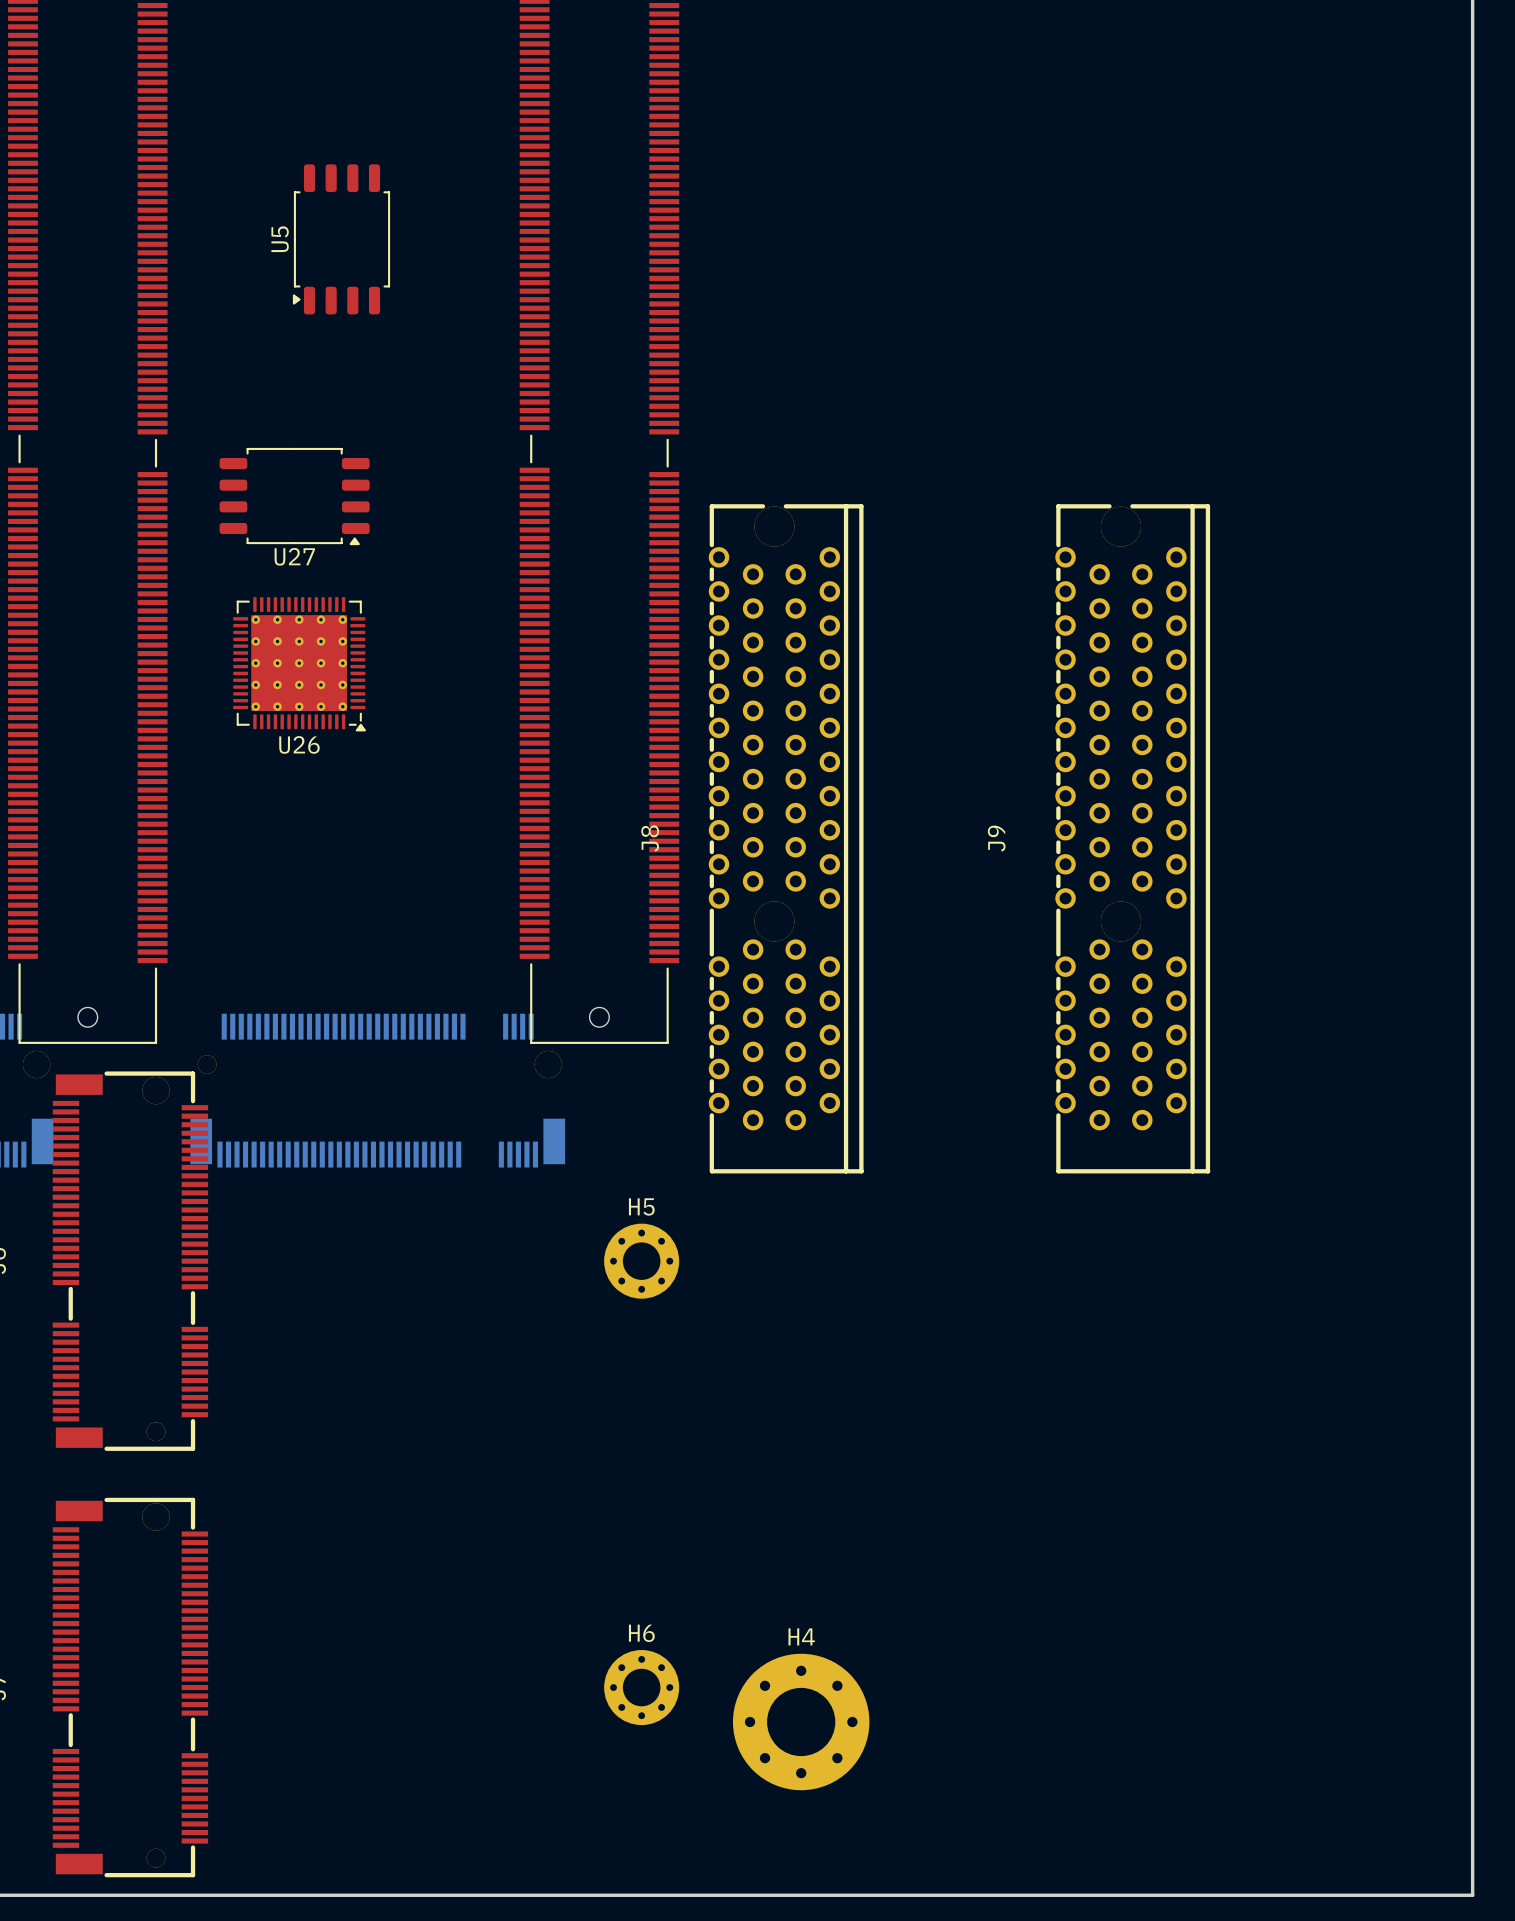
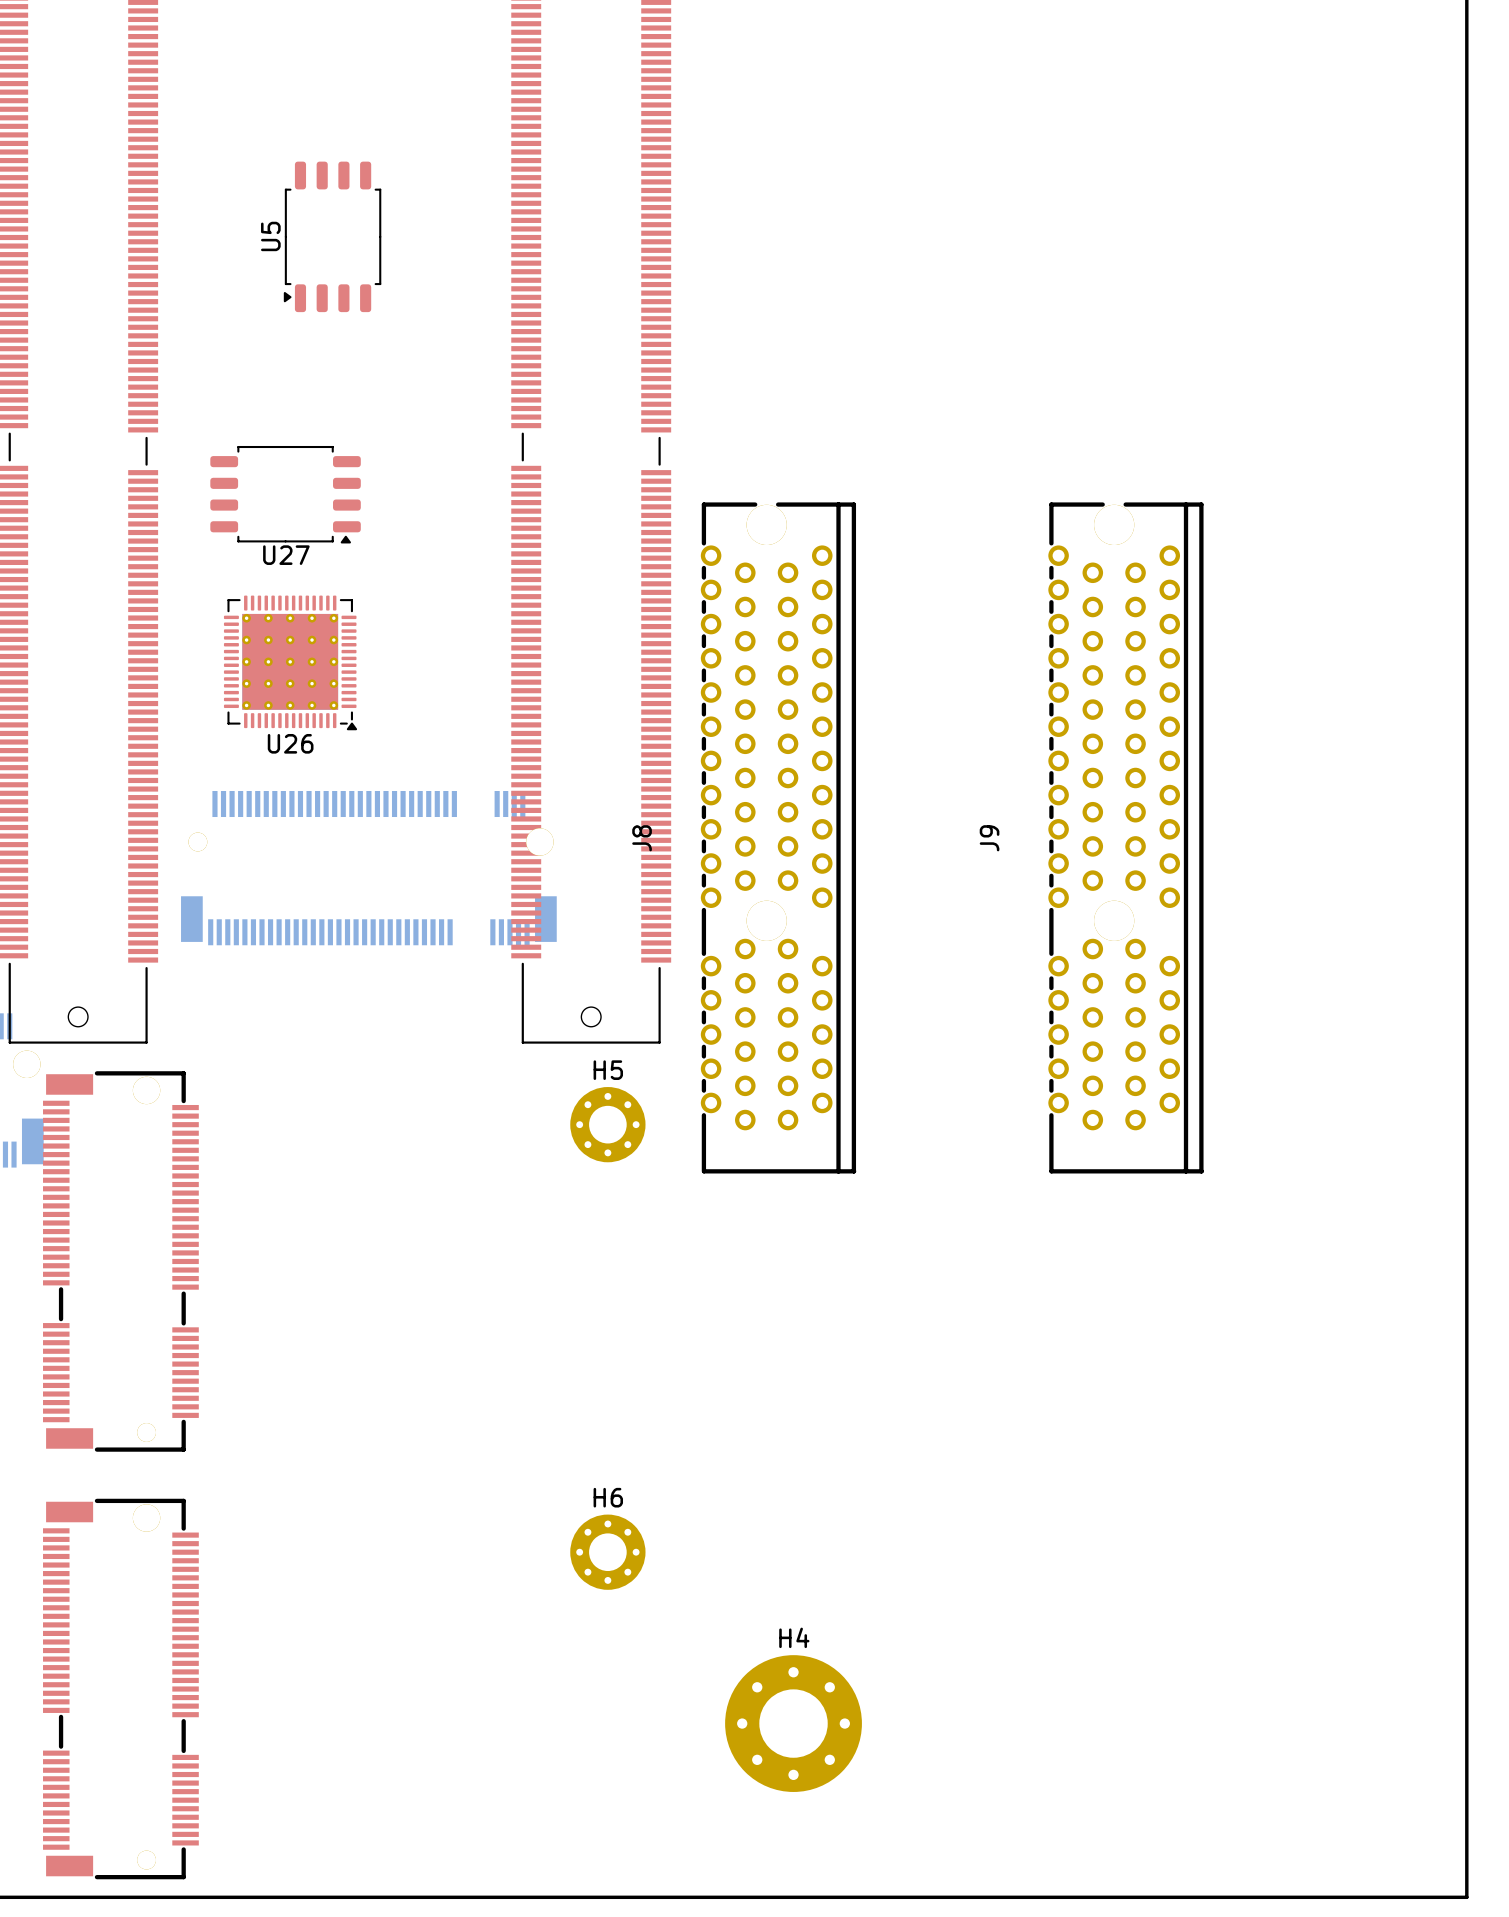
part position: (377, 1090) -> (368, 868)
H5 position: (641, 1261) -> (607, 1124)
H6 position: (641, 1687) -> (607, 1552)

